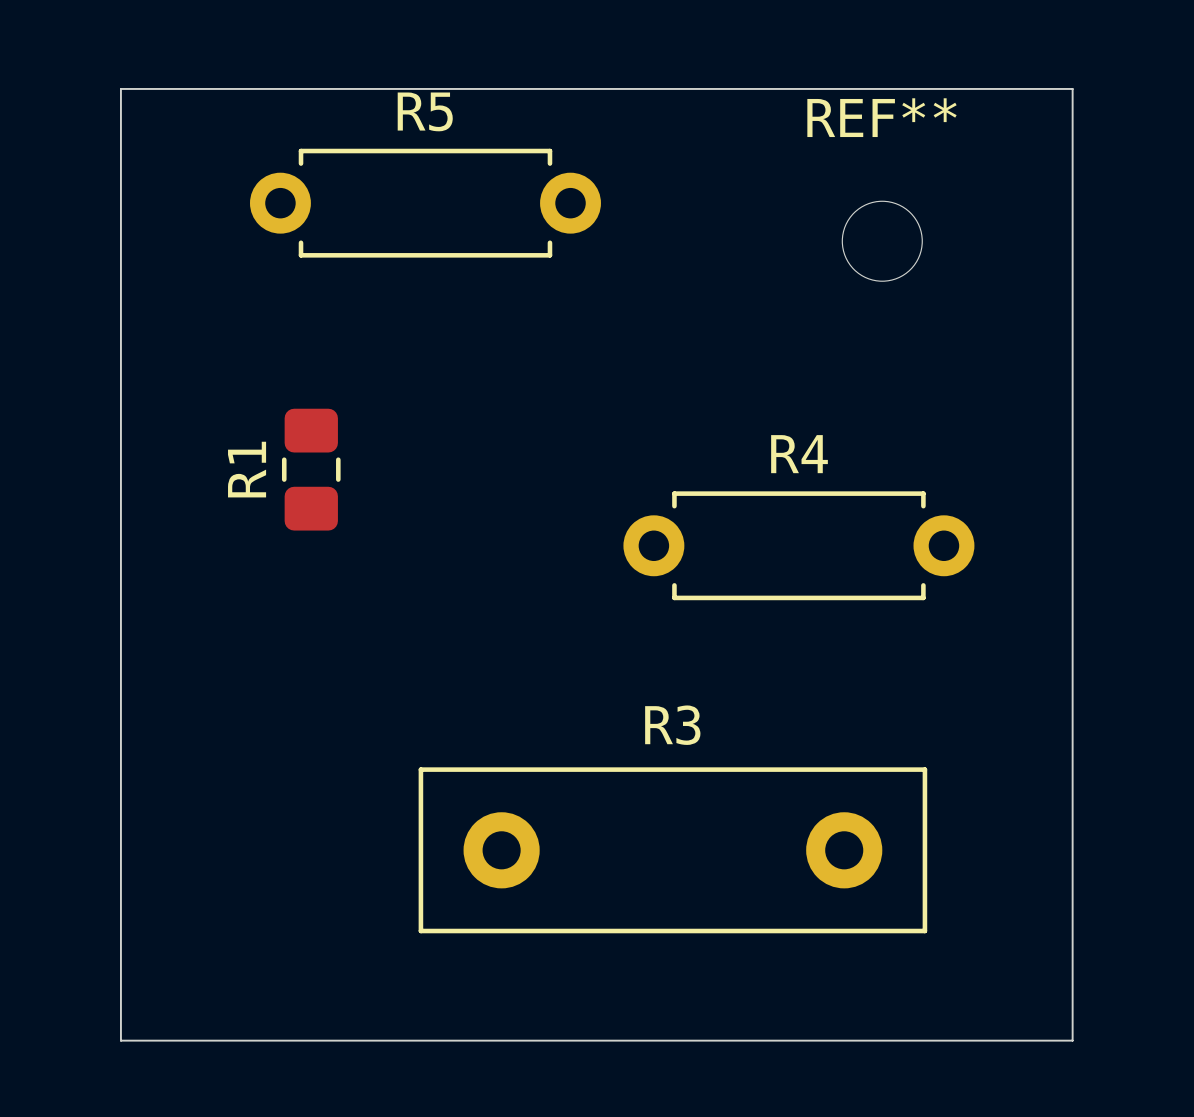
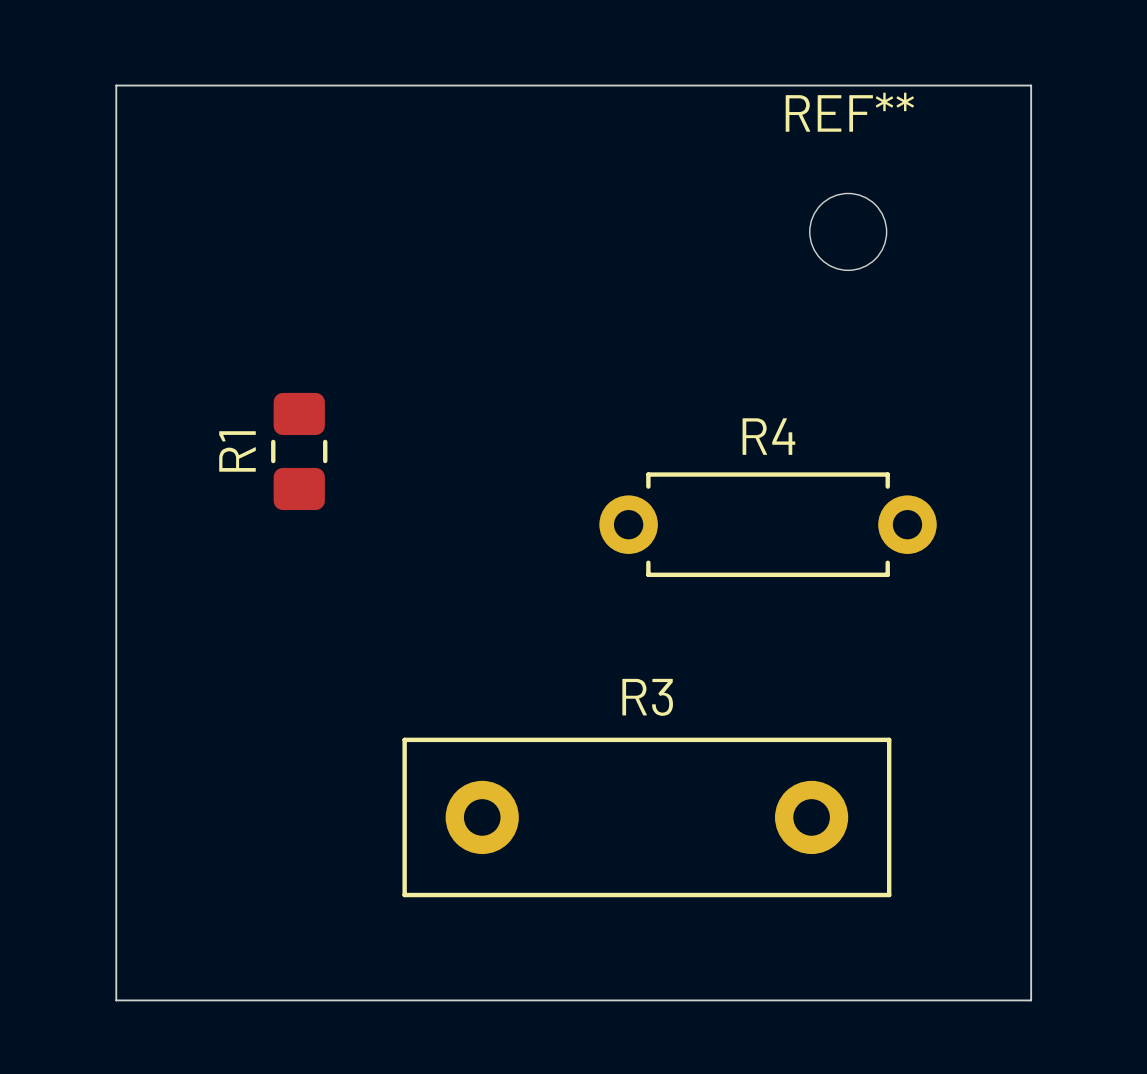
R5: (425, 203) -> none

